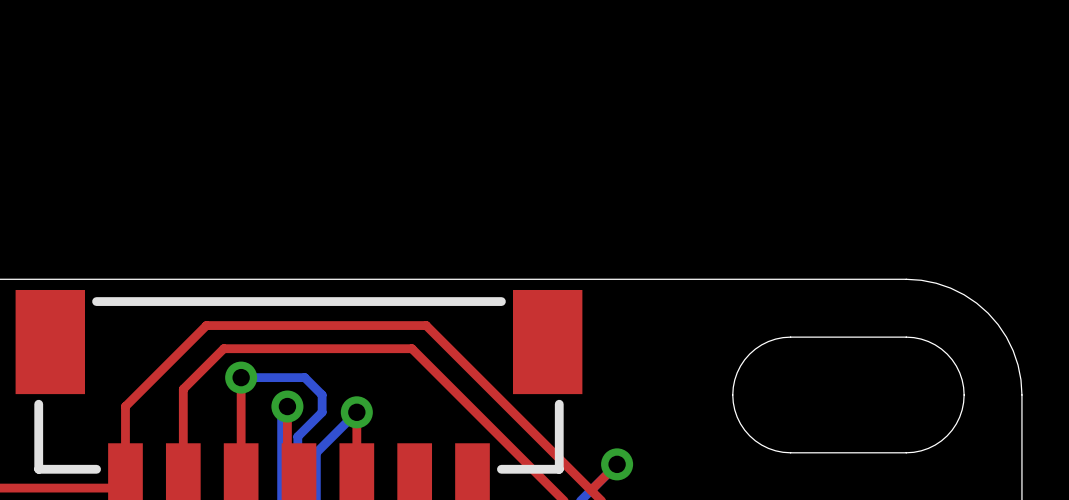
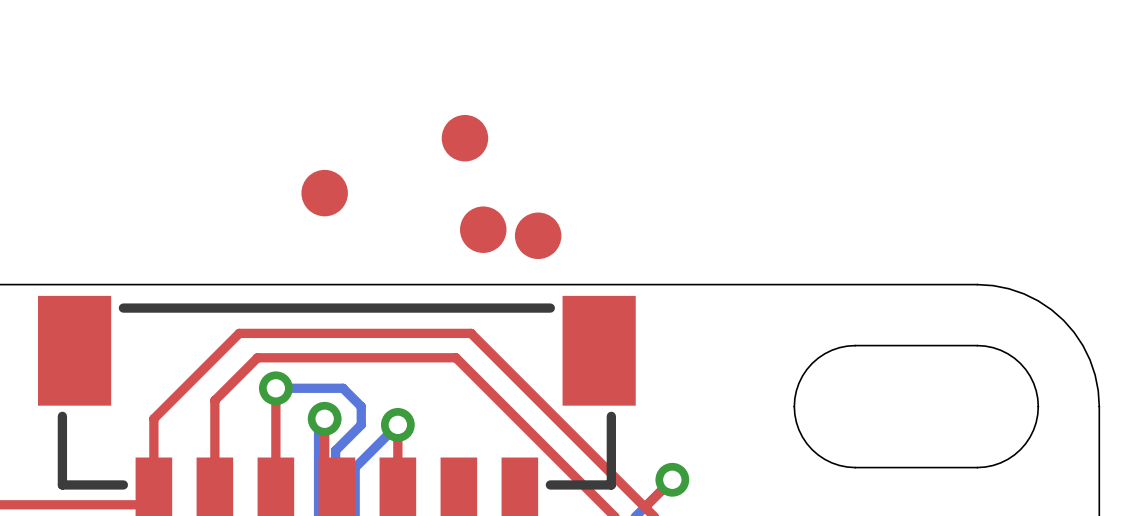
part: none -> (464, 138)
part: none -> (324, 193)
part: none -> (483, 229)
part: none -> (538, 235)

